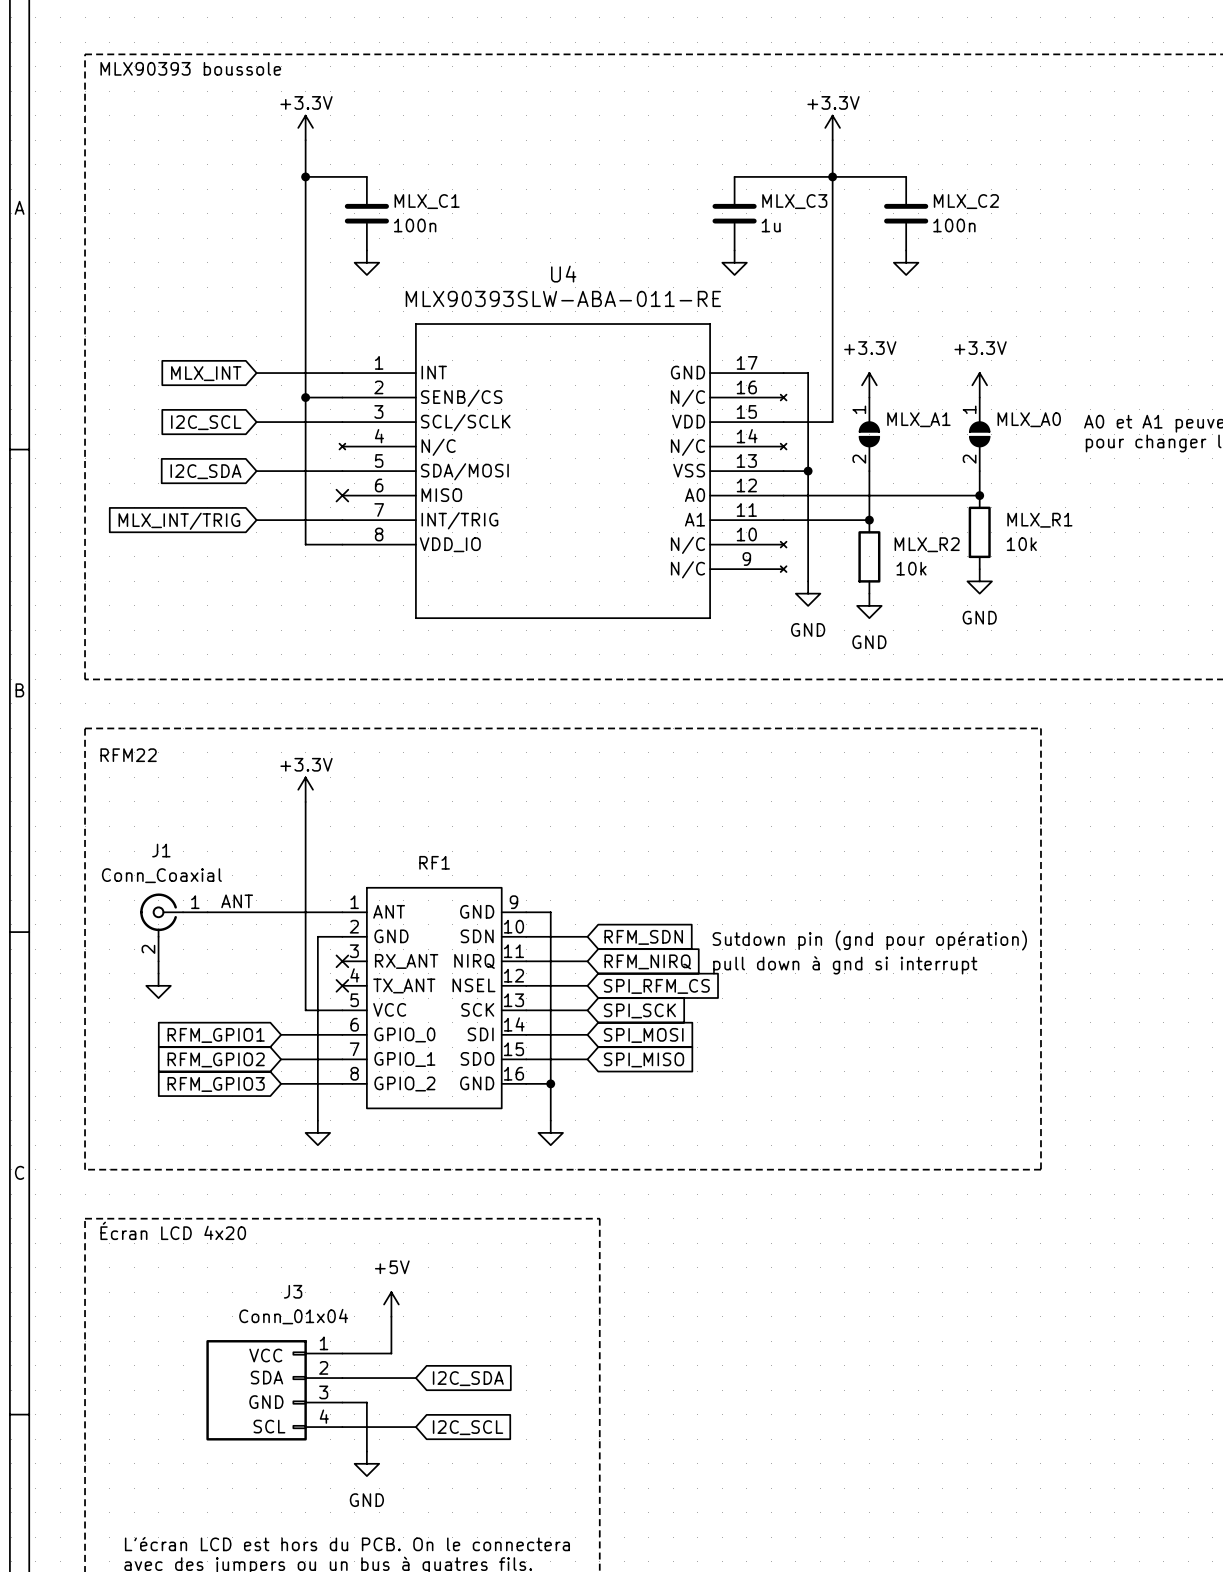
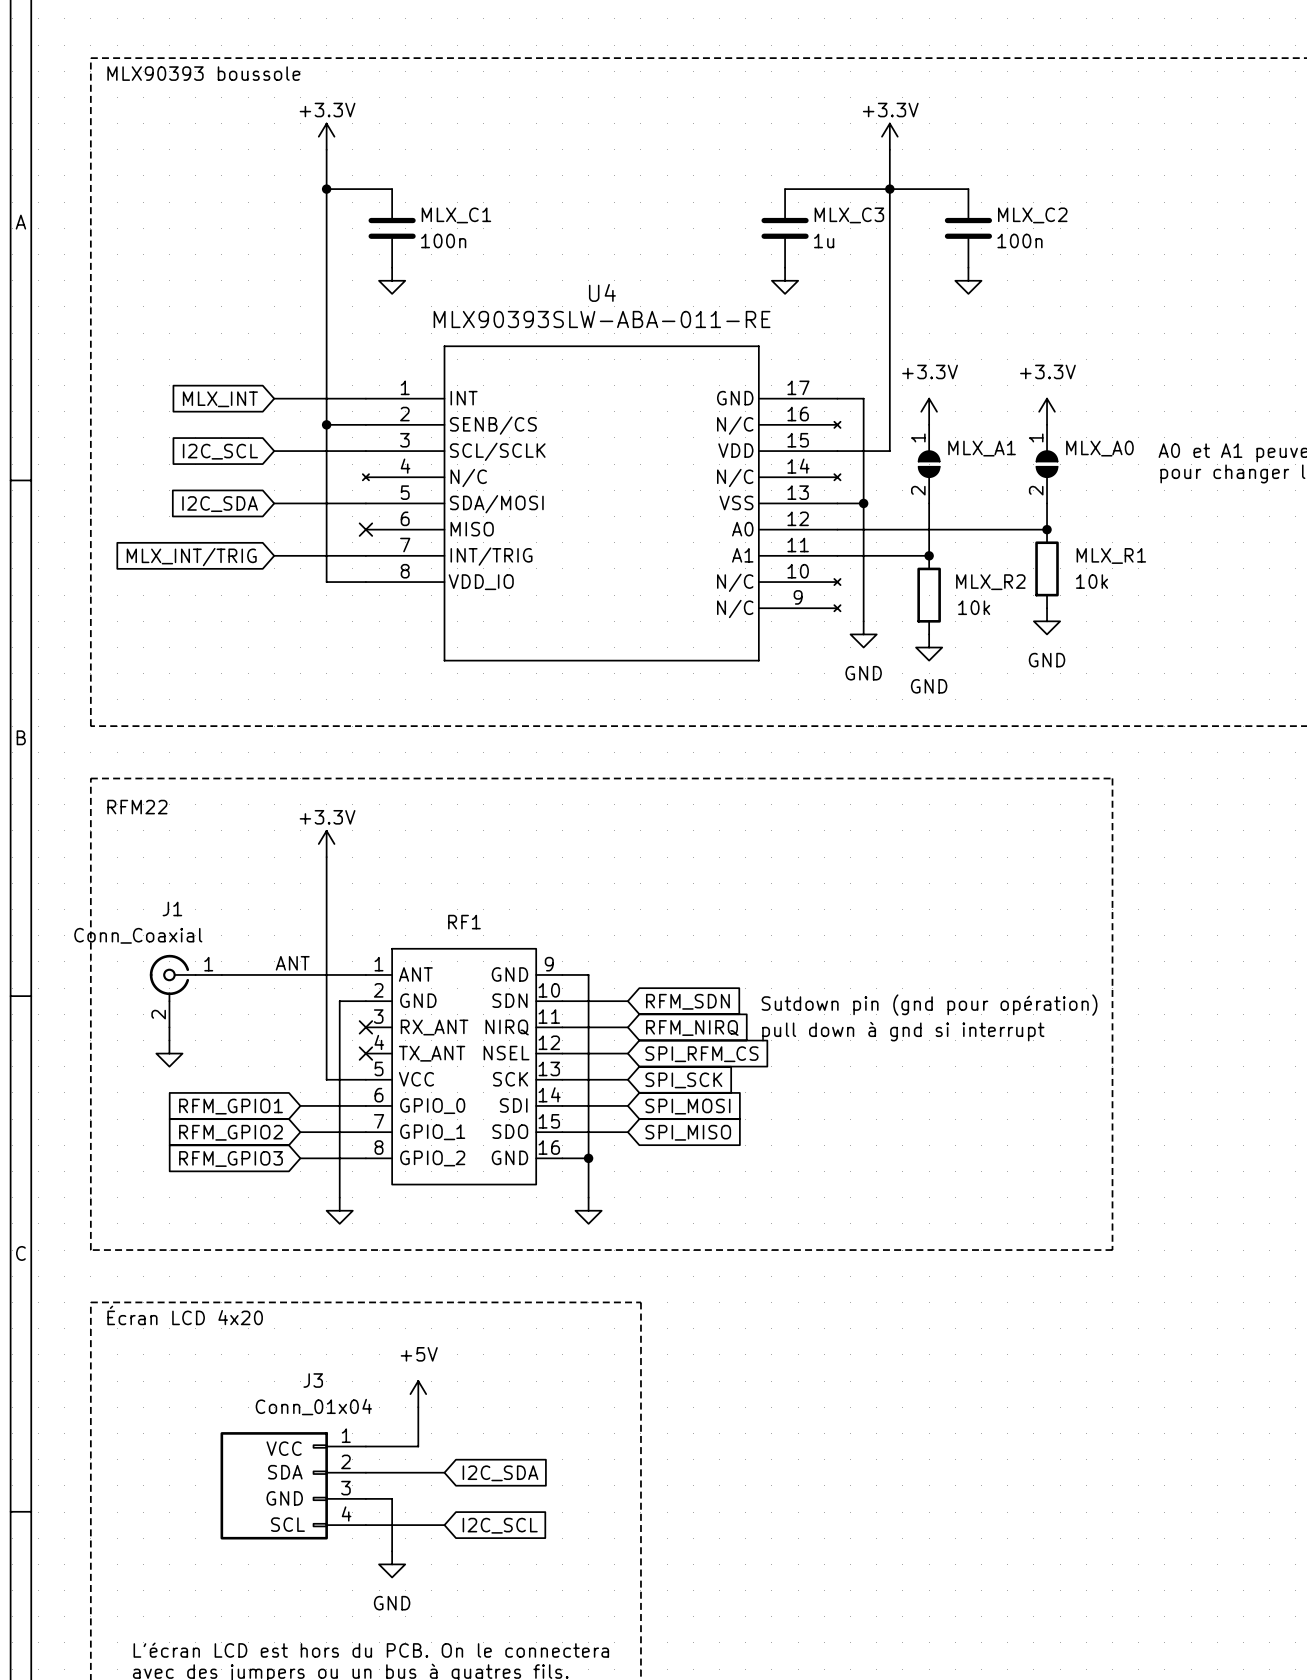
J1 value position: Conn_Coaxial (161, 875) -> Conn_Coaxial (138, 935)
label position: ANT (237, 901) -> ANT (292, 963)

